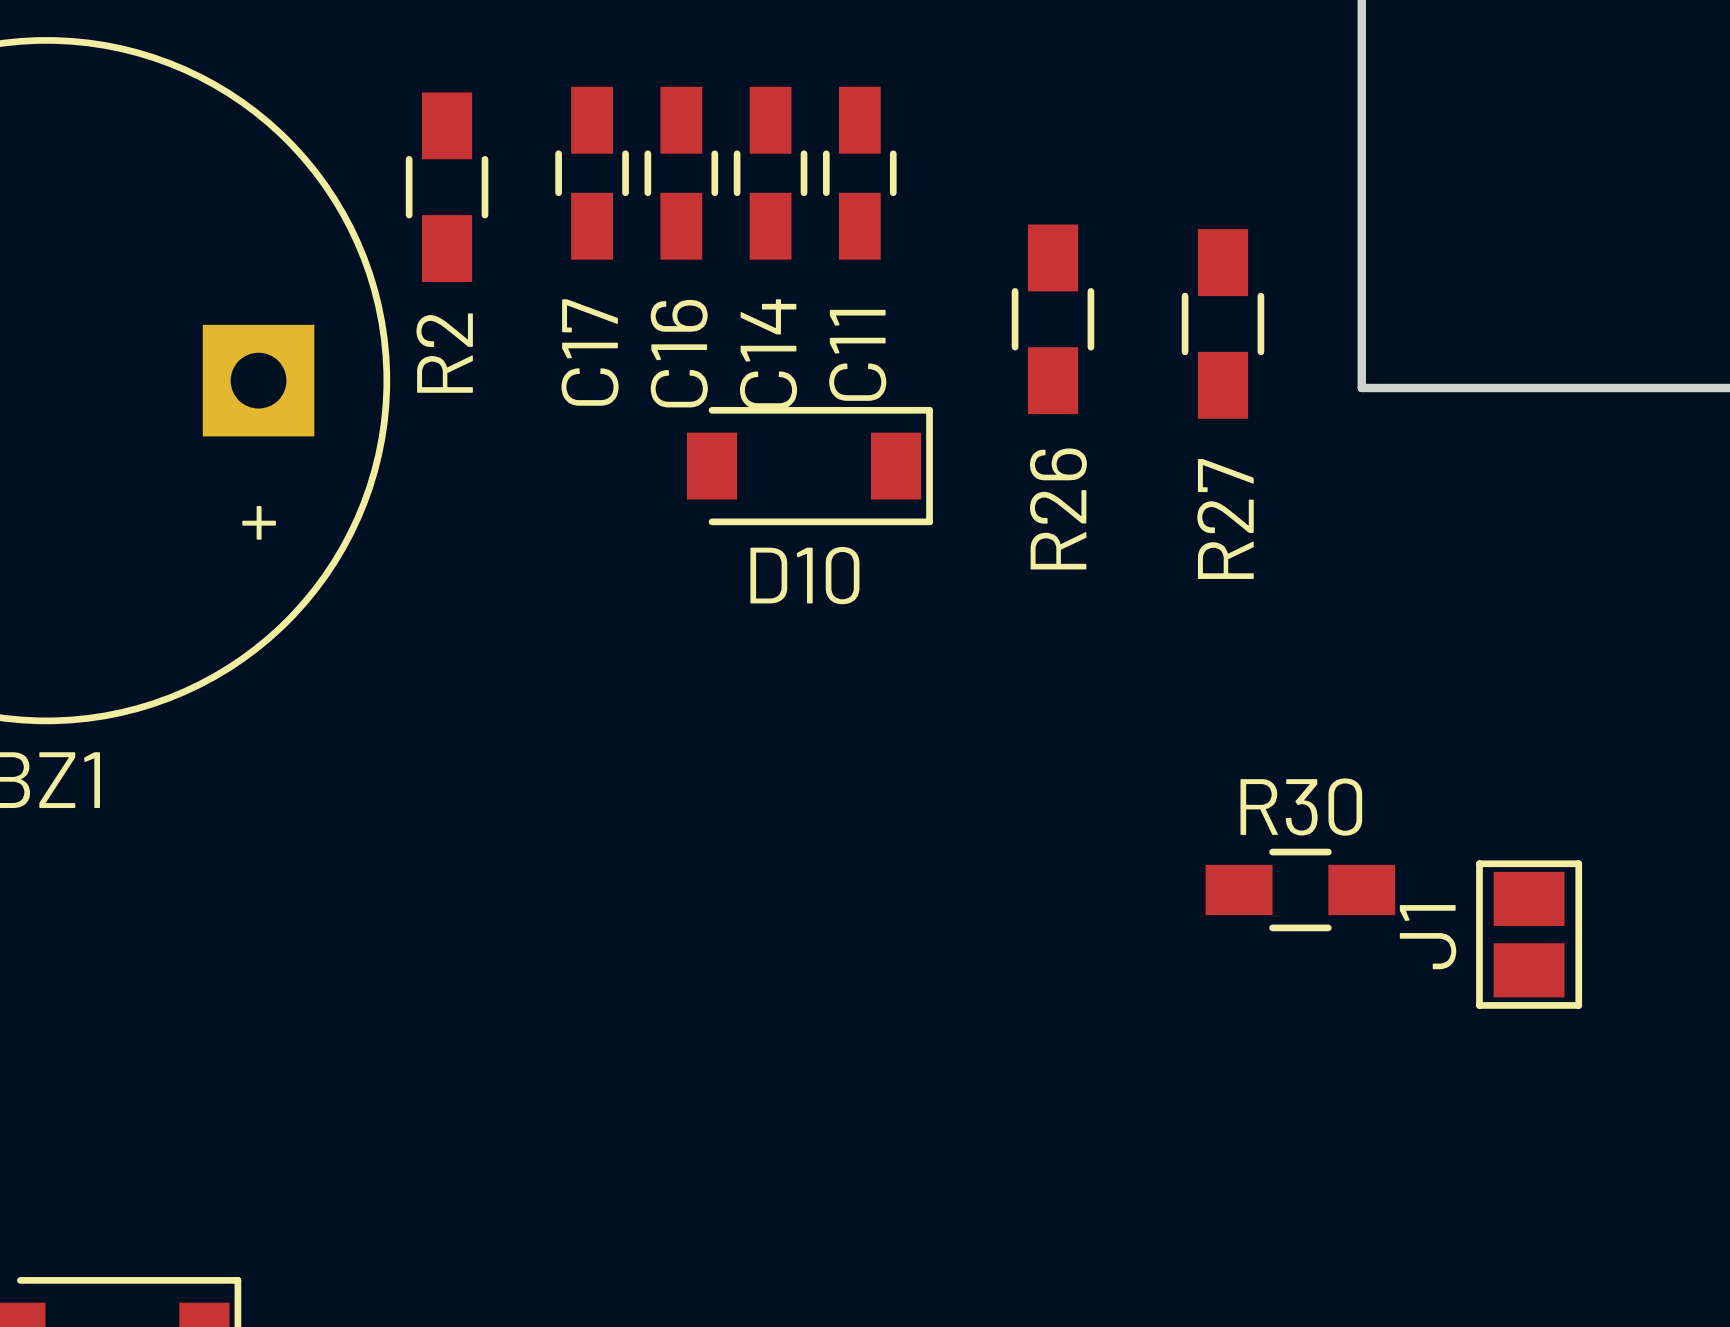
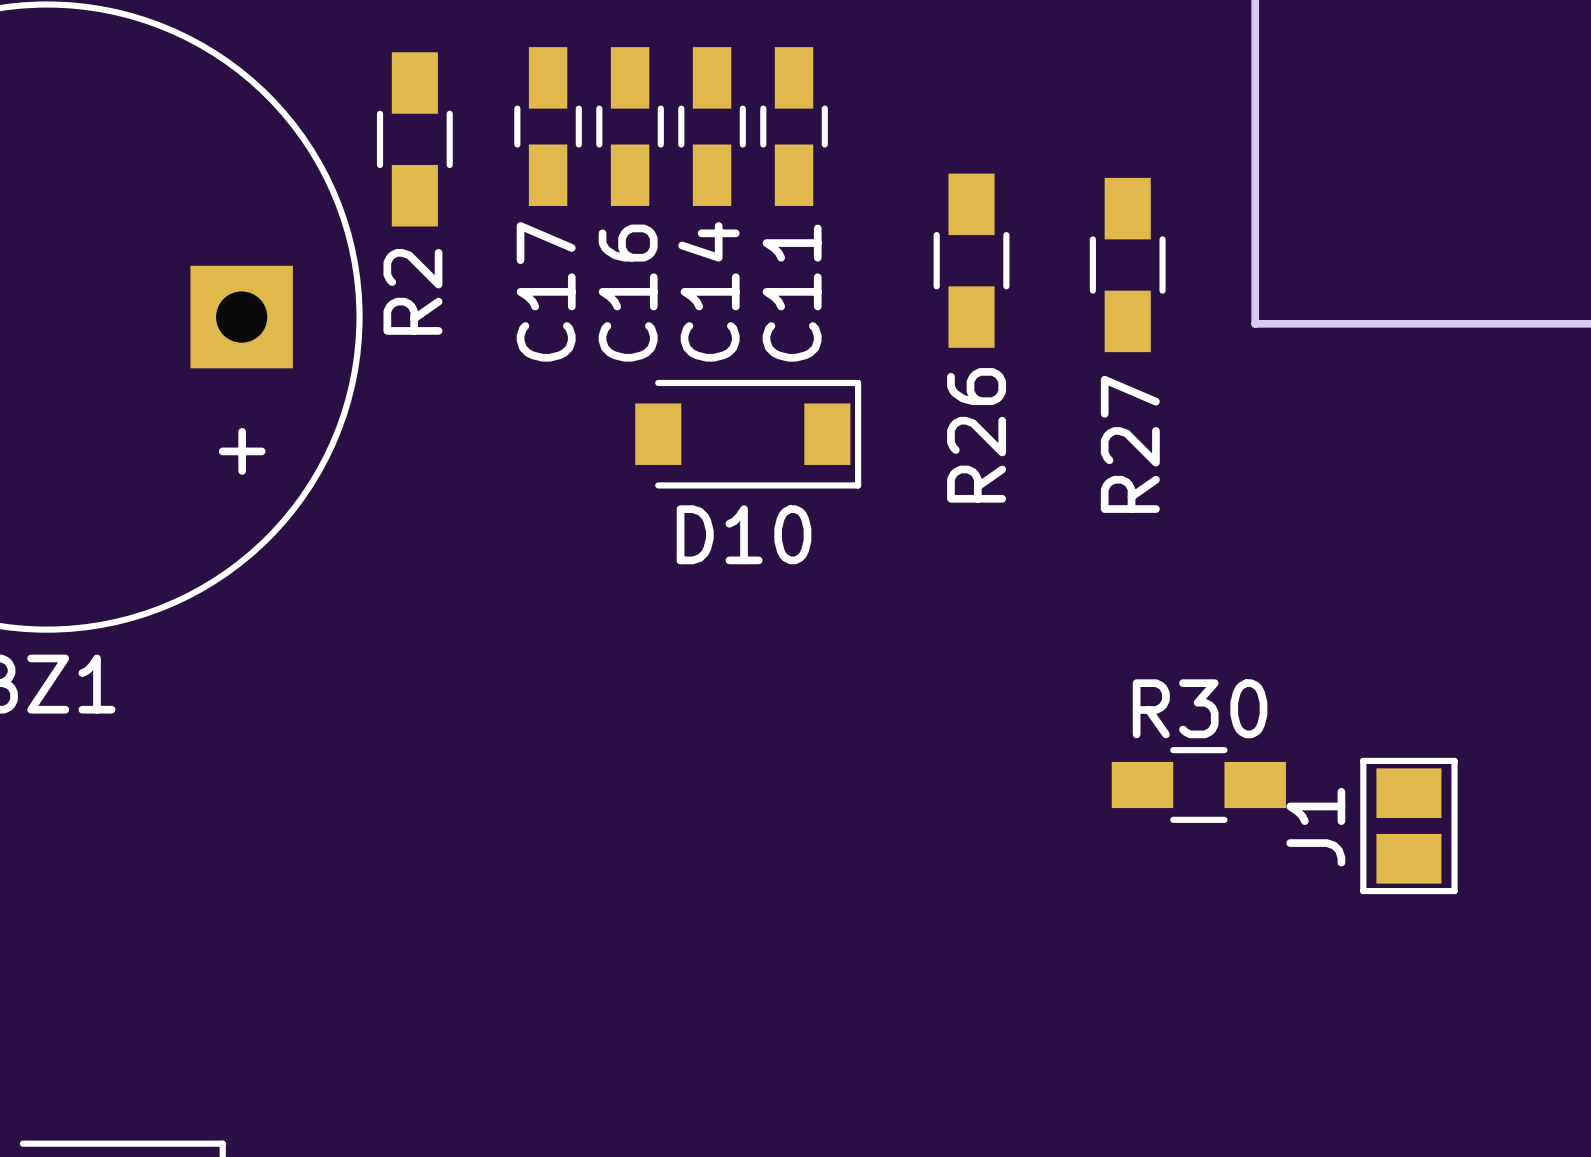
D10 position: (809, 466) -> (748, 434)

